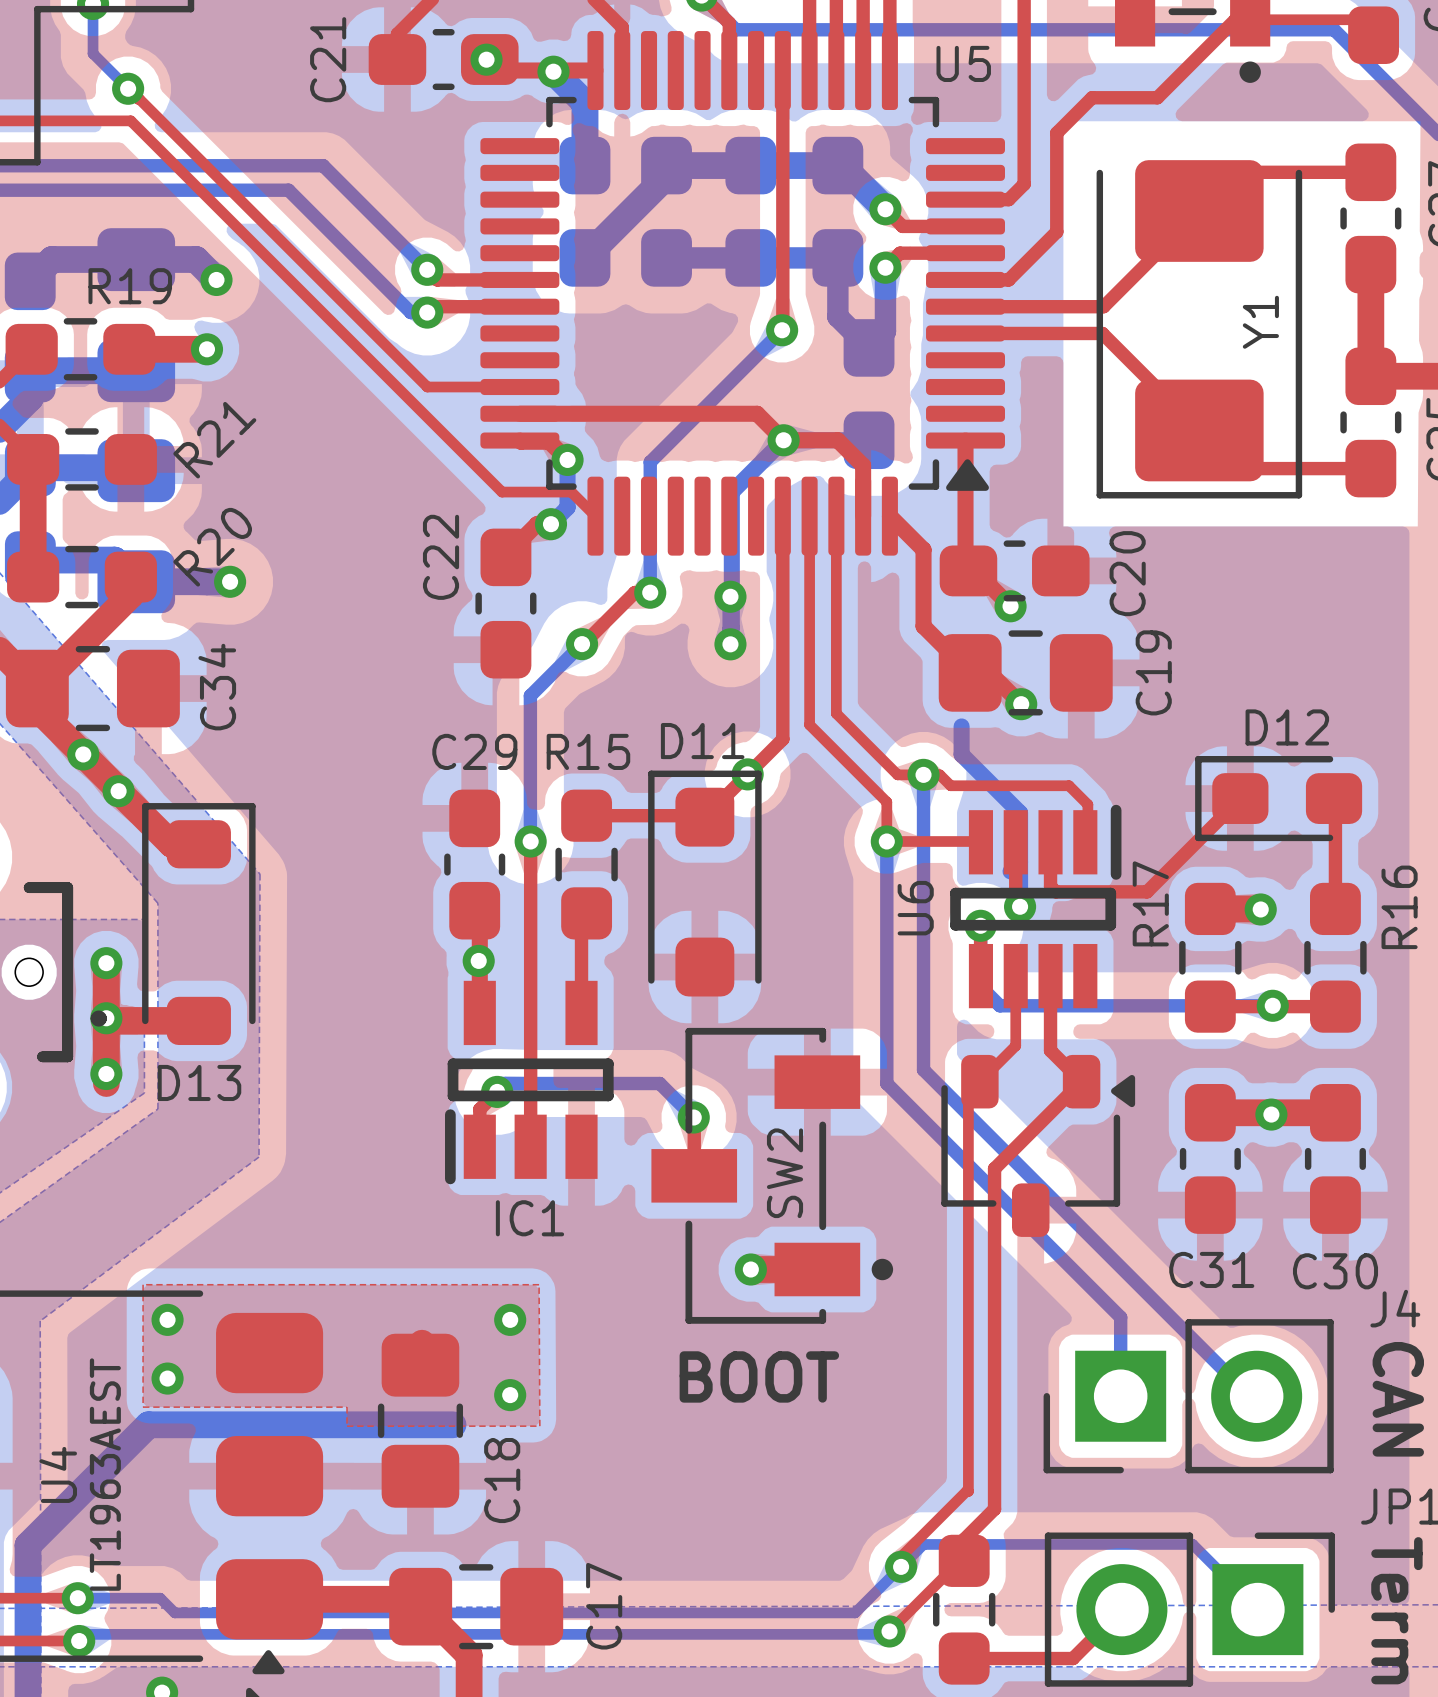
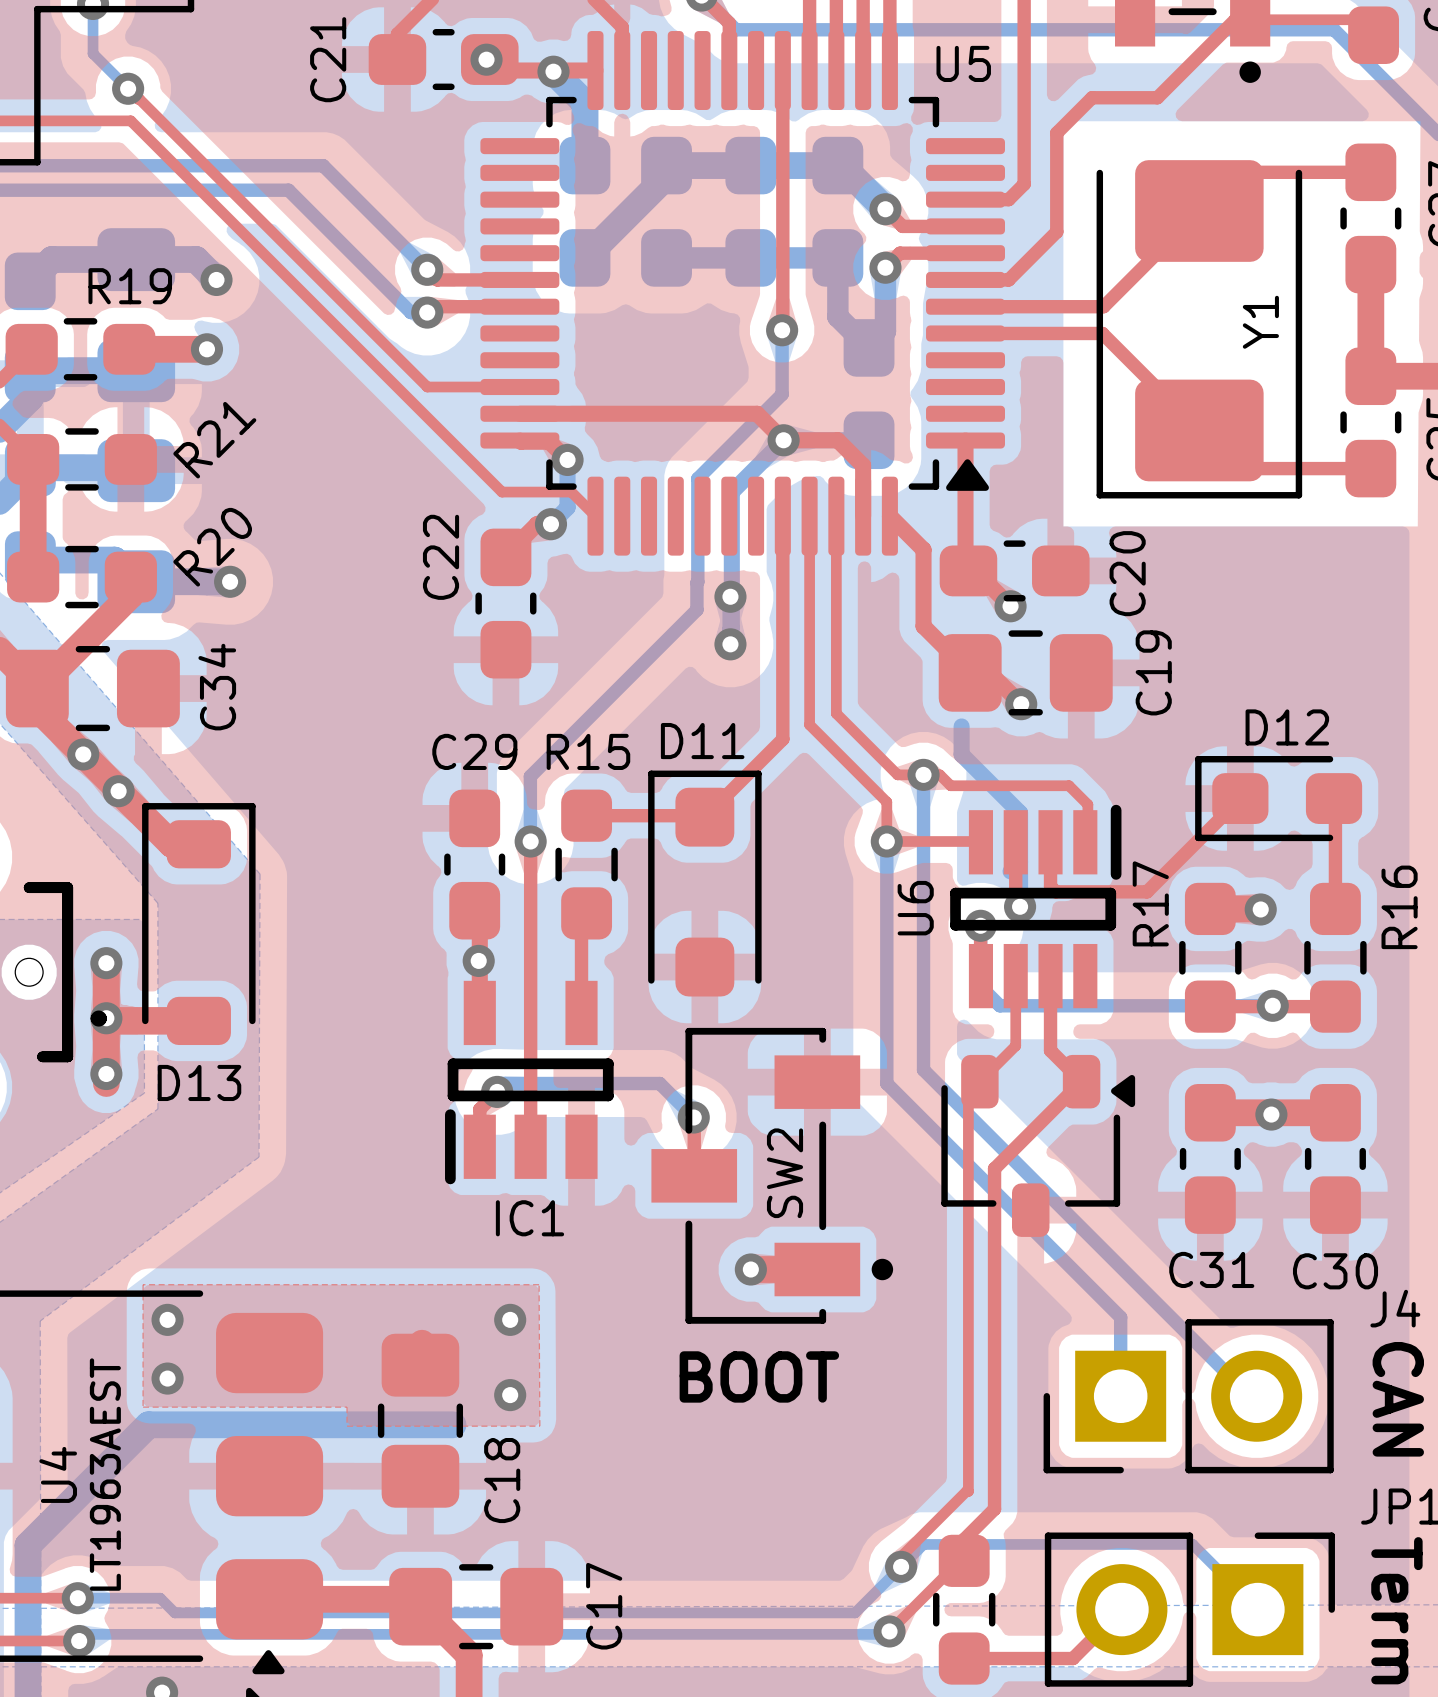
bottom track: (782, 330) (650, 462) (650, 592) -> (782, 330) (782, 394) (697, 478) (696, 609) (530, 776)
top track: (650, 592) (634, 592) (582, 644) -> none
via: (650, 592) -> none
bottom track: (582, 644) (530, 695) (530, 776) -> none
via: (582, 644) -> none
via: (747, 774) -> none

